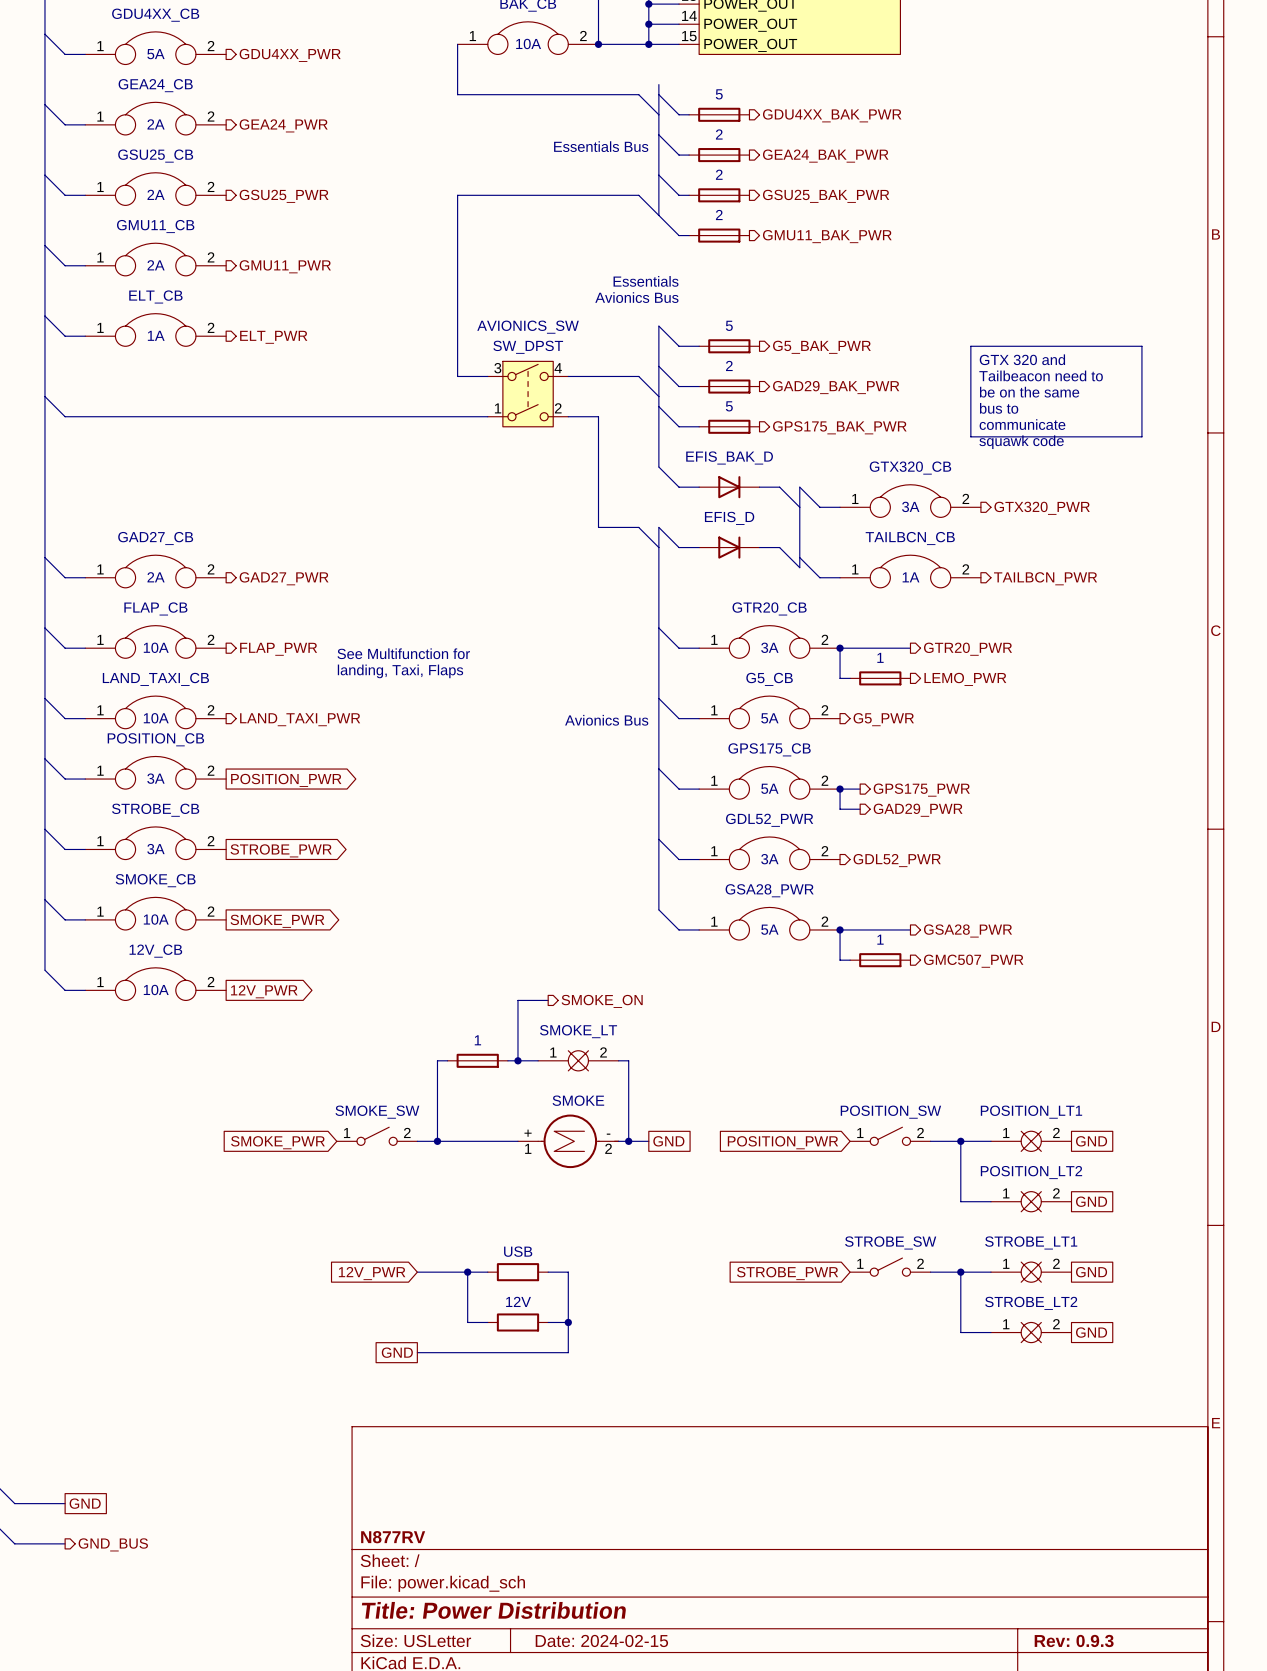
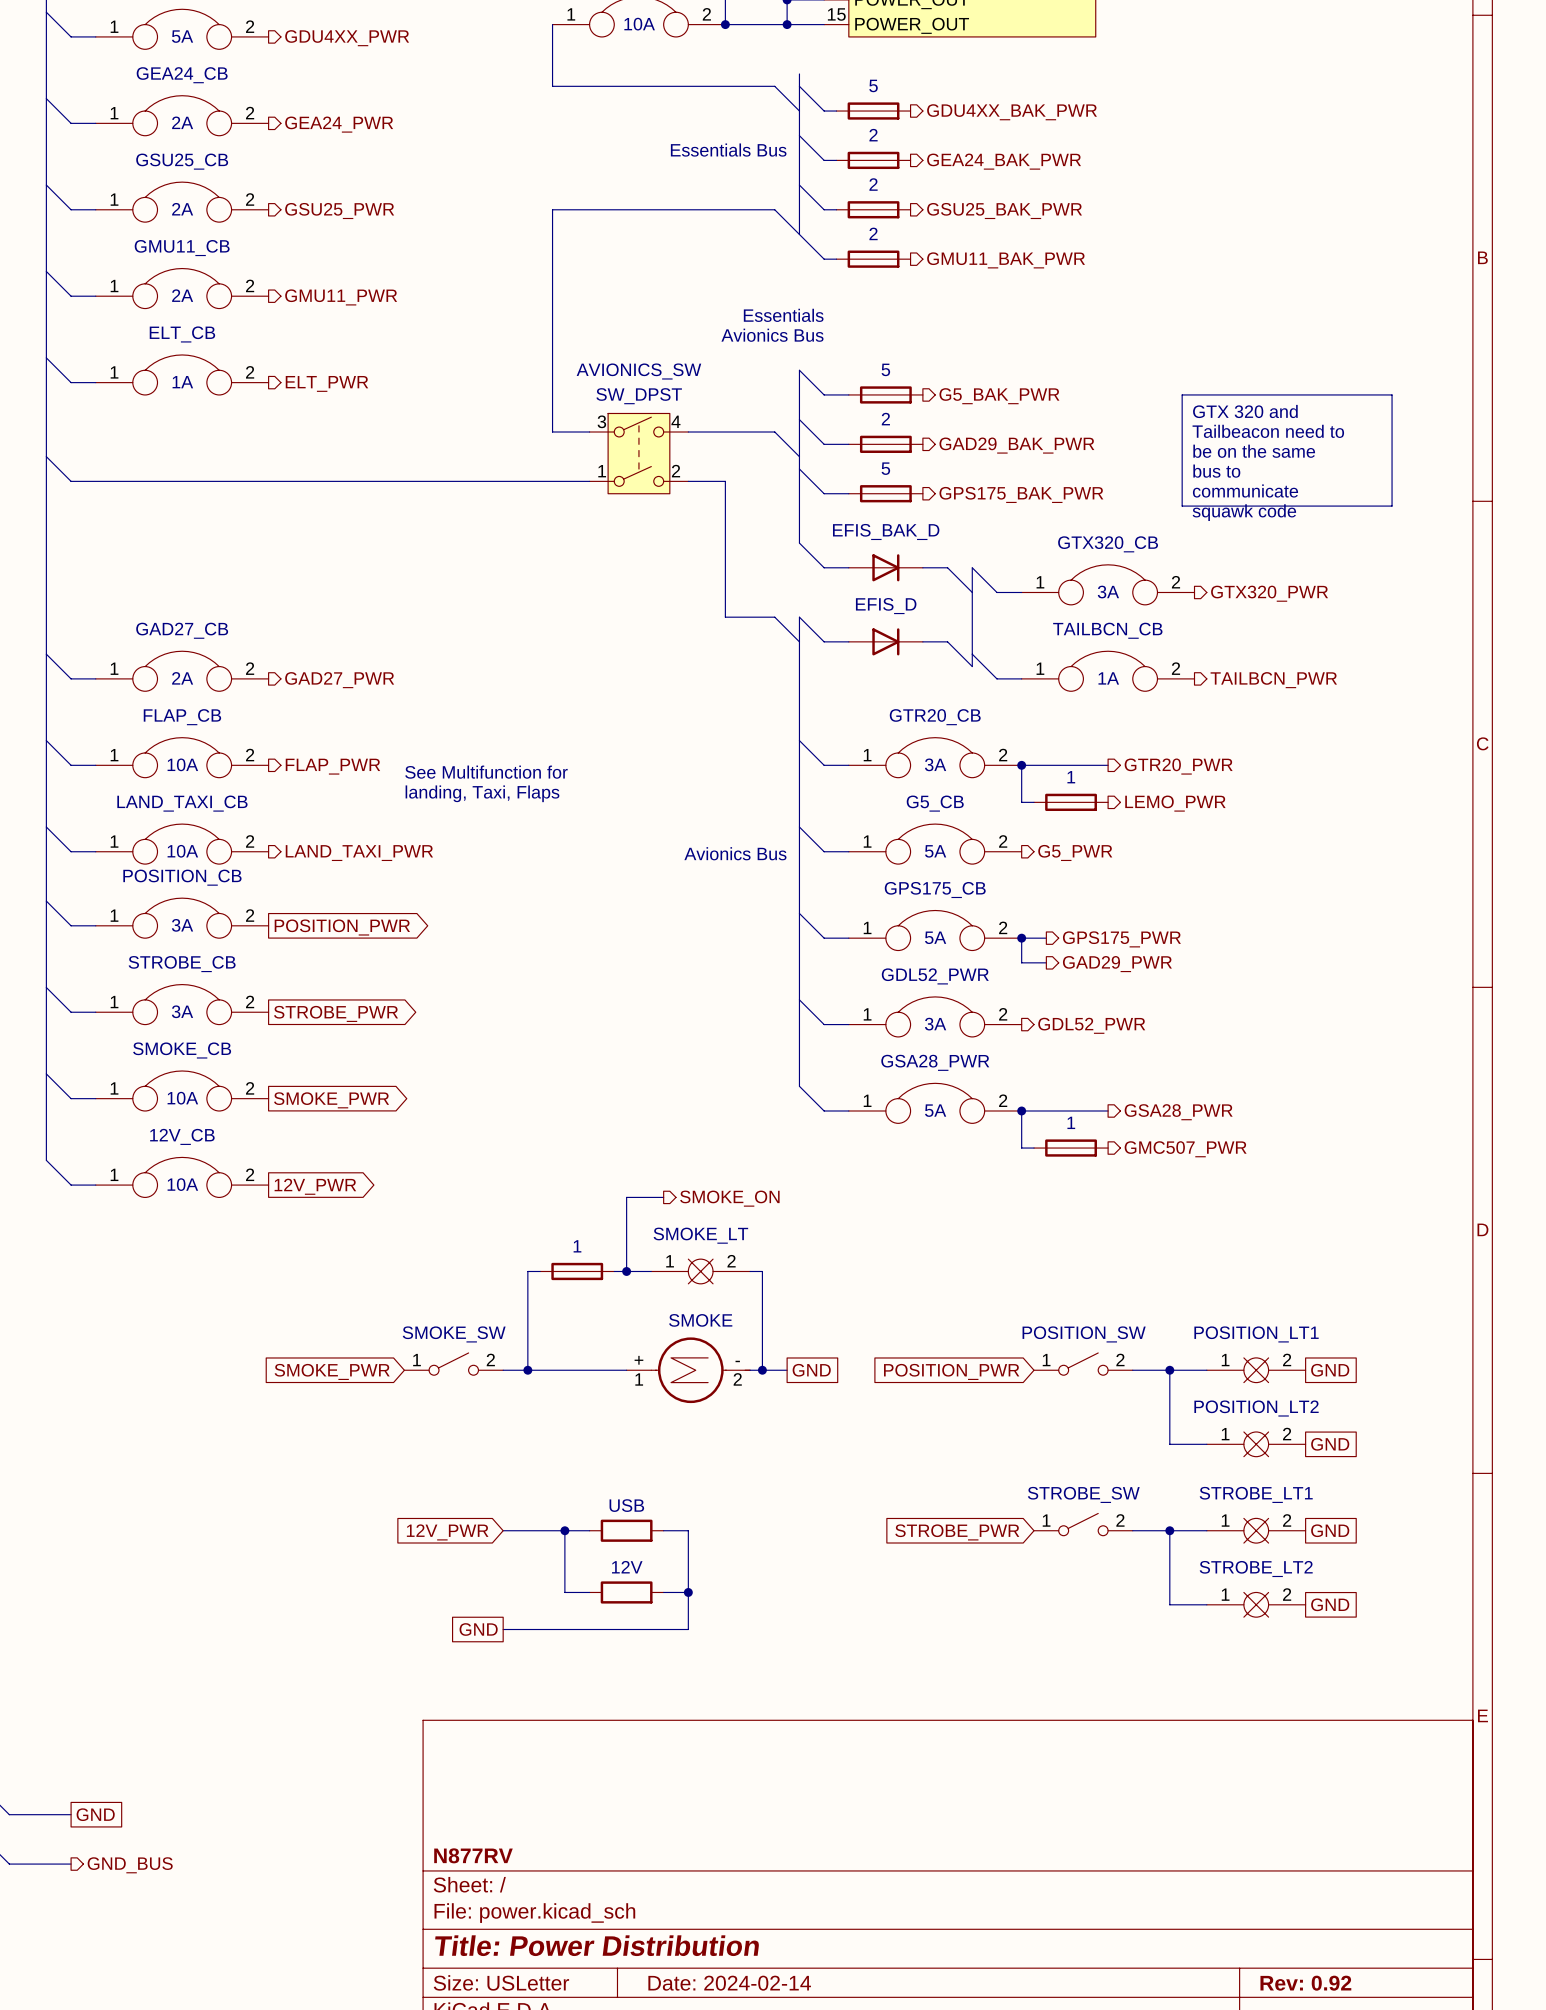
title block: Date: 2024-02-15 (601, 1640) -> Date: 2024-02-14 (729, 1983)
title block: Rev: 0.9.3 (1074, 1640) -> Rev: 0.92 (1305, 1983)

